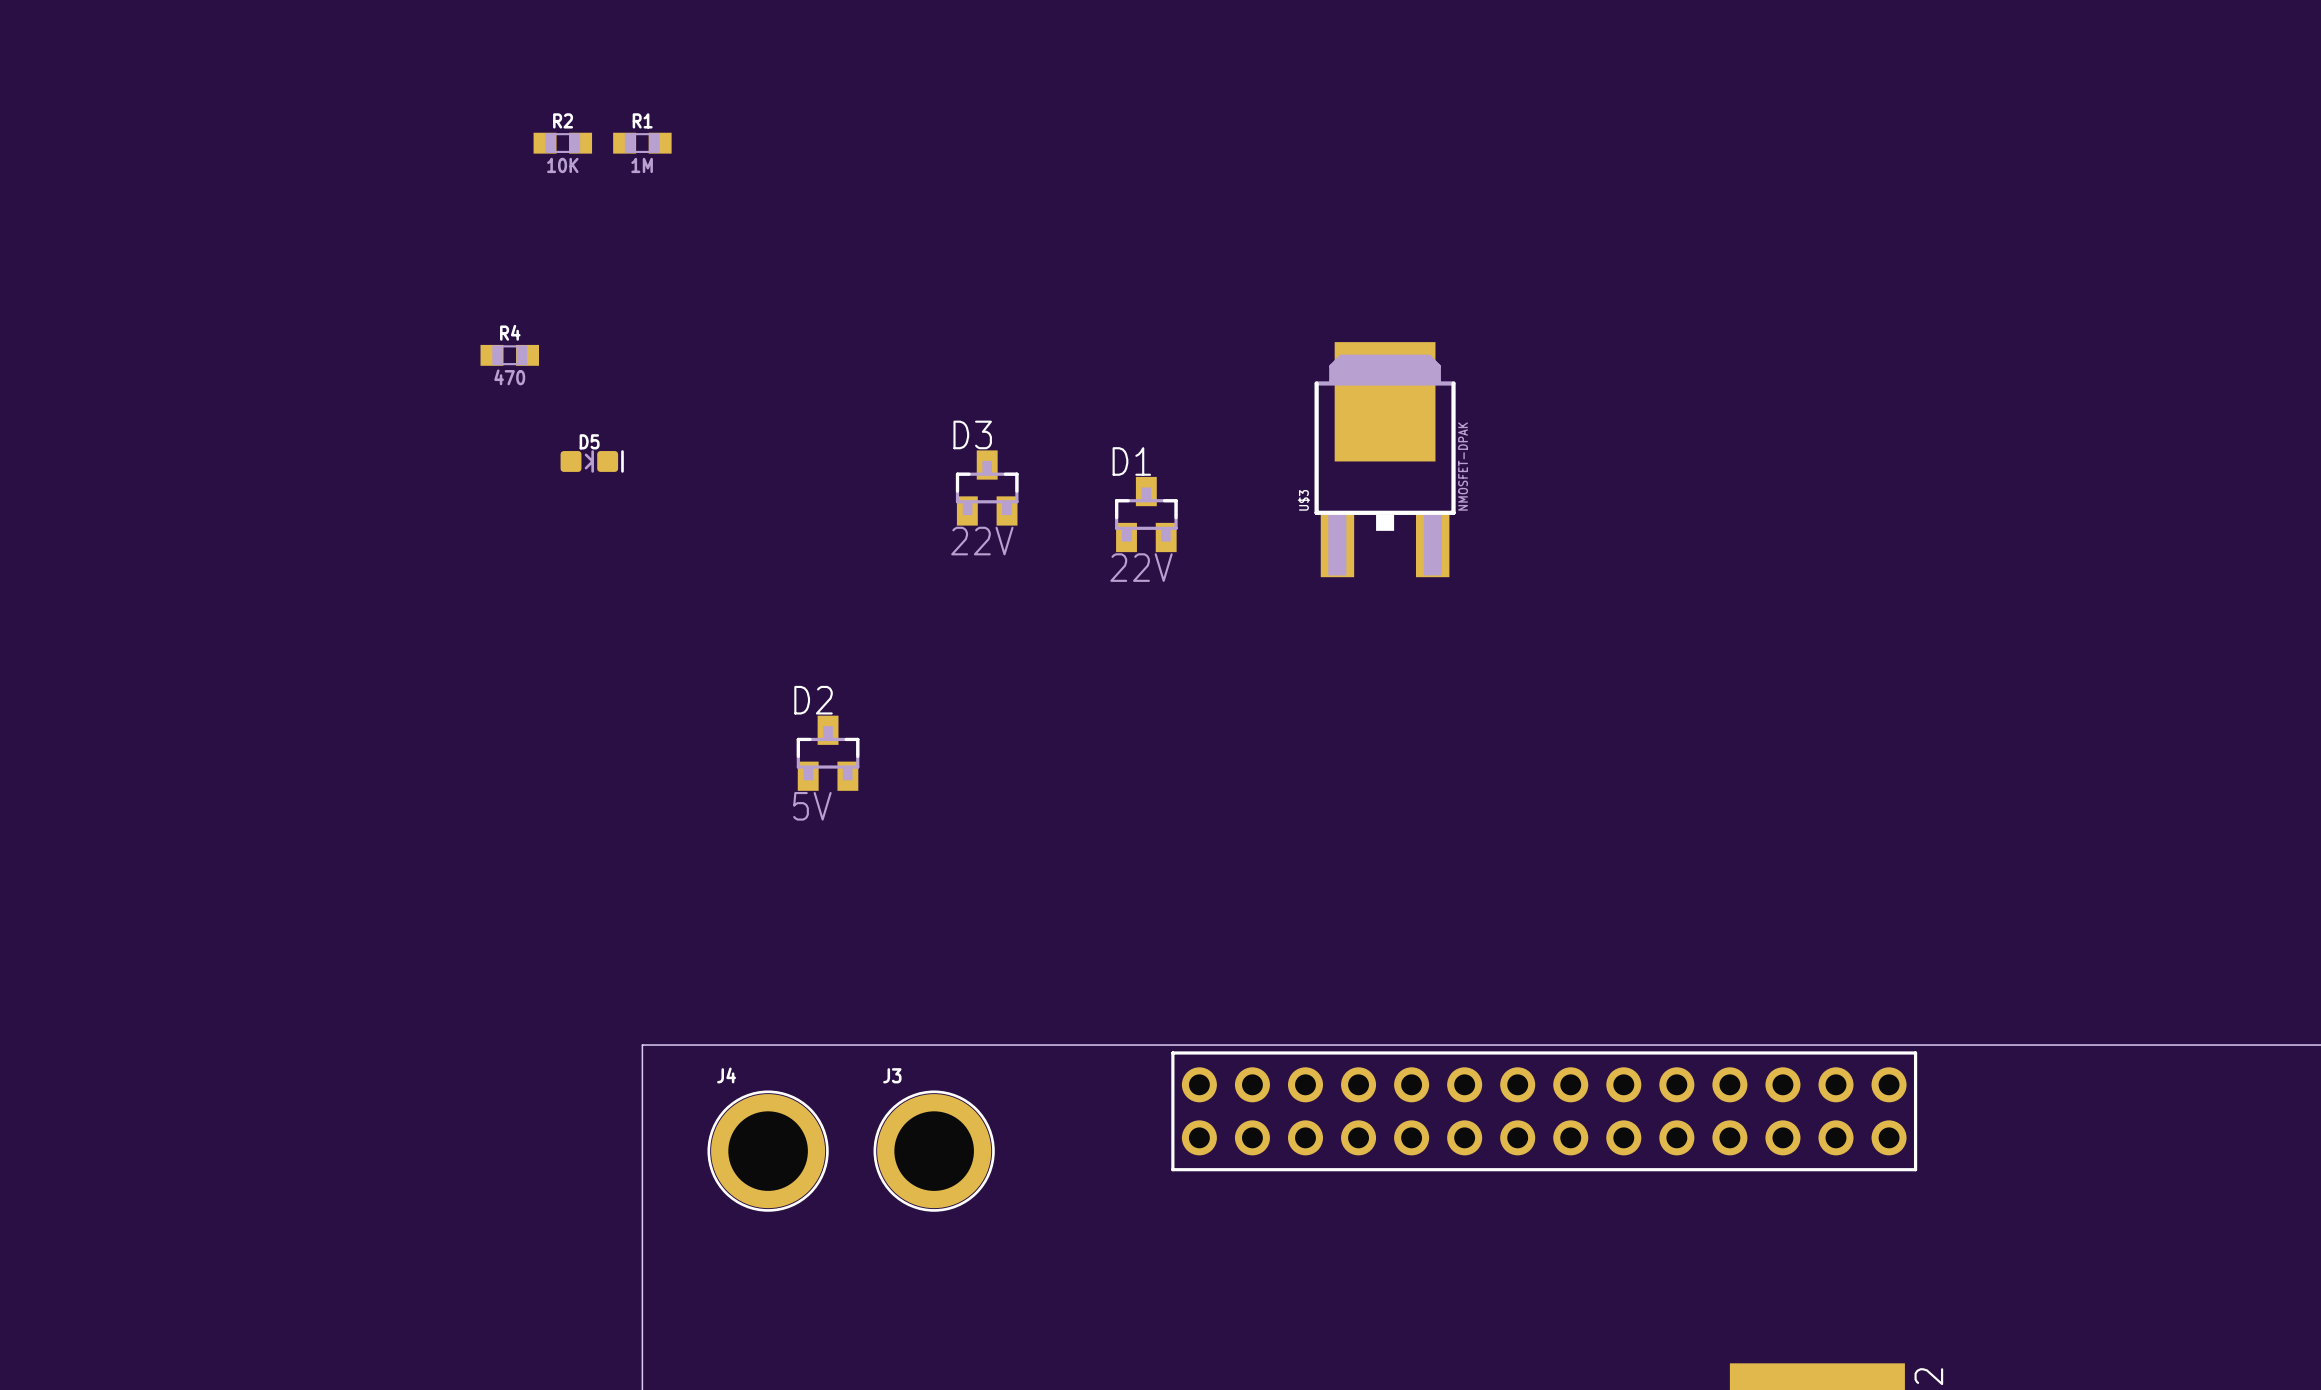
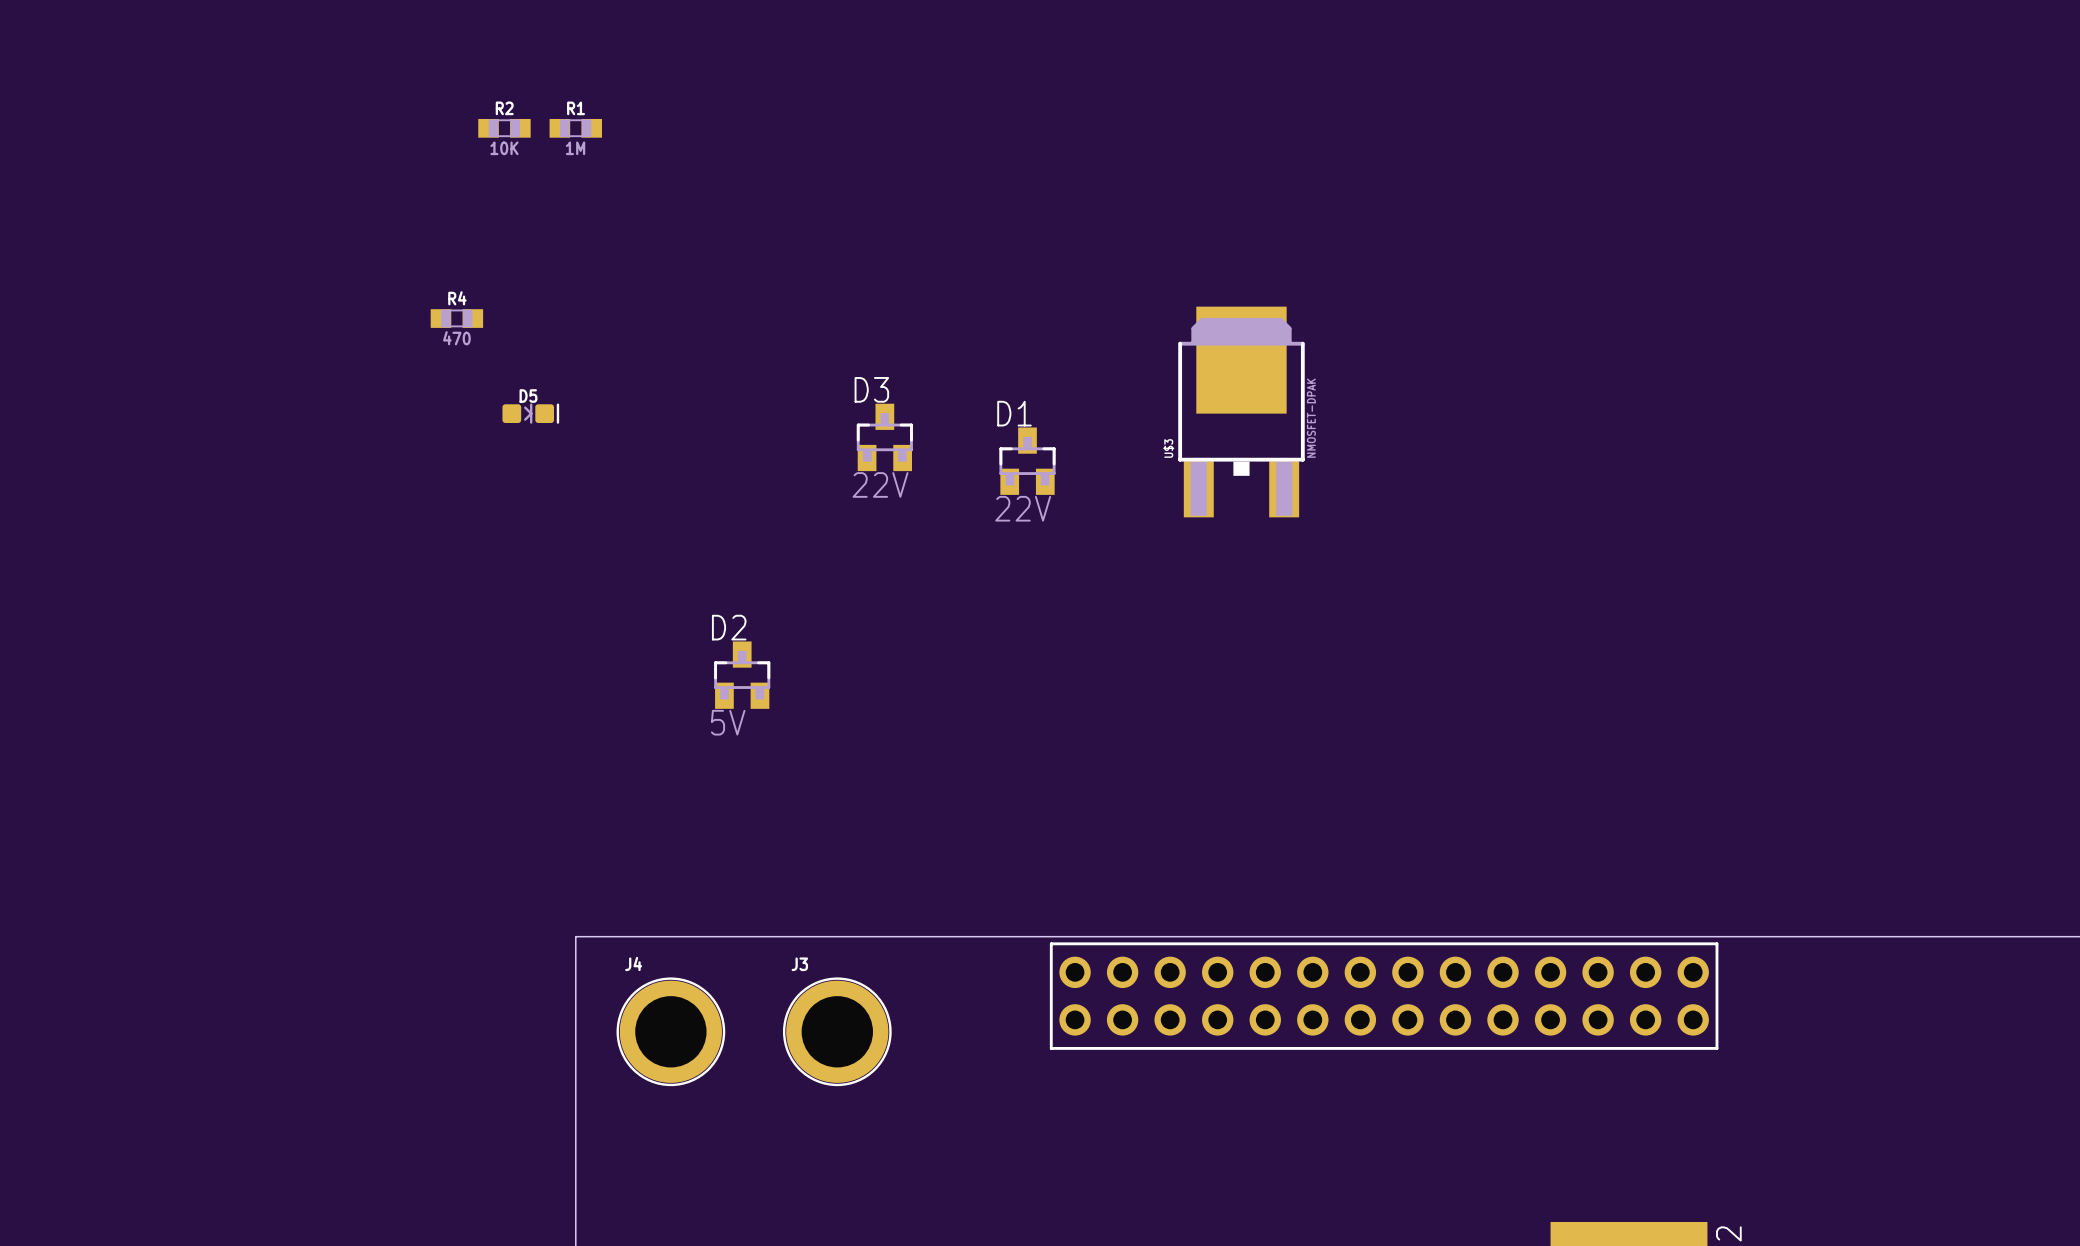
J4 position: (768, 1151) -> (670, 1031)

